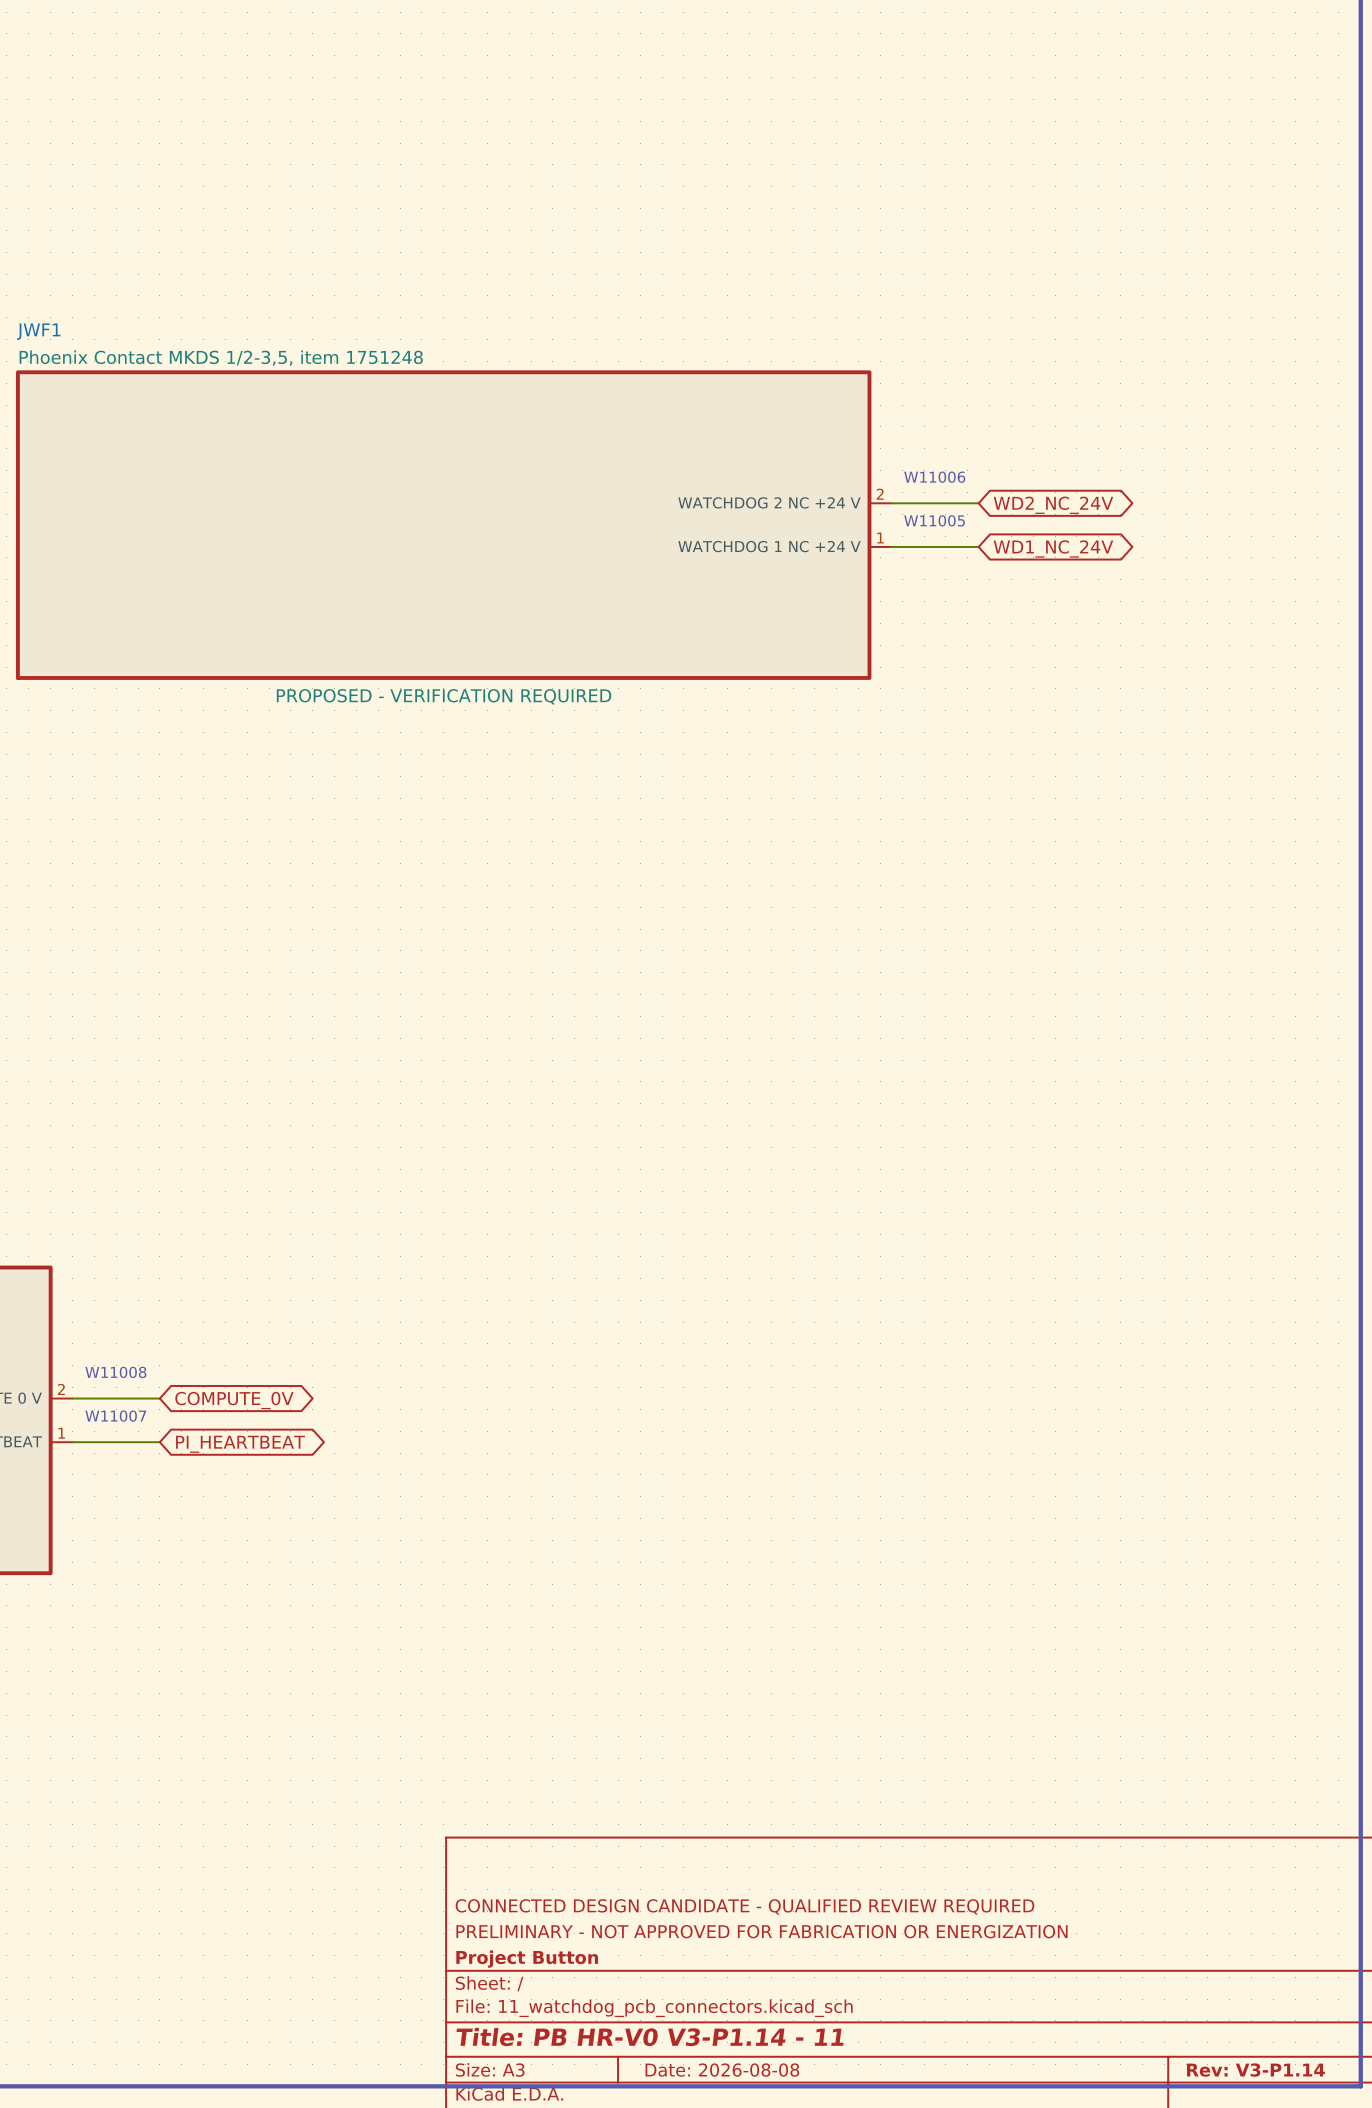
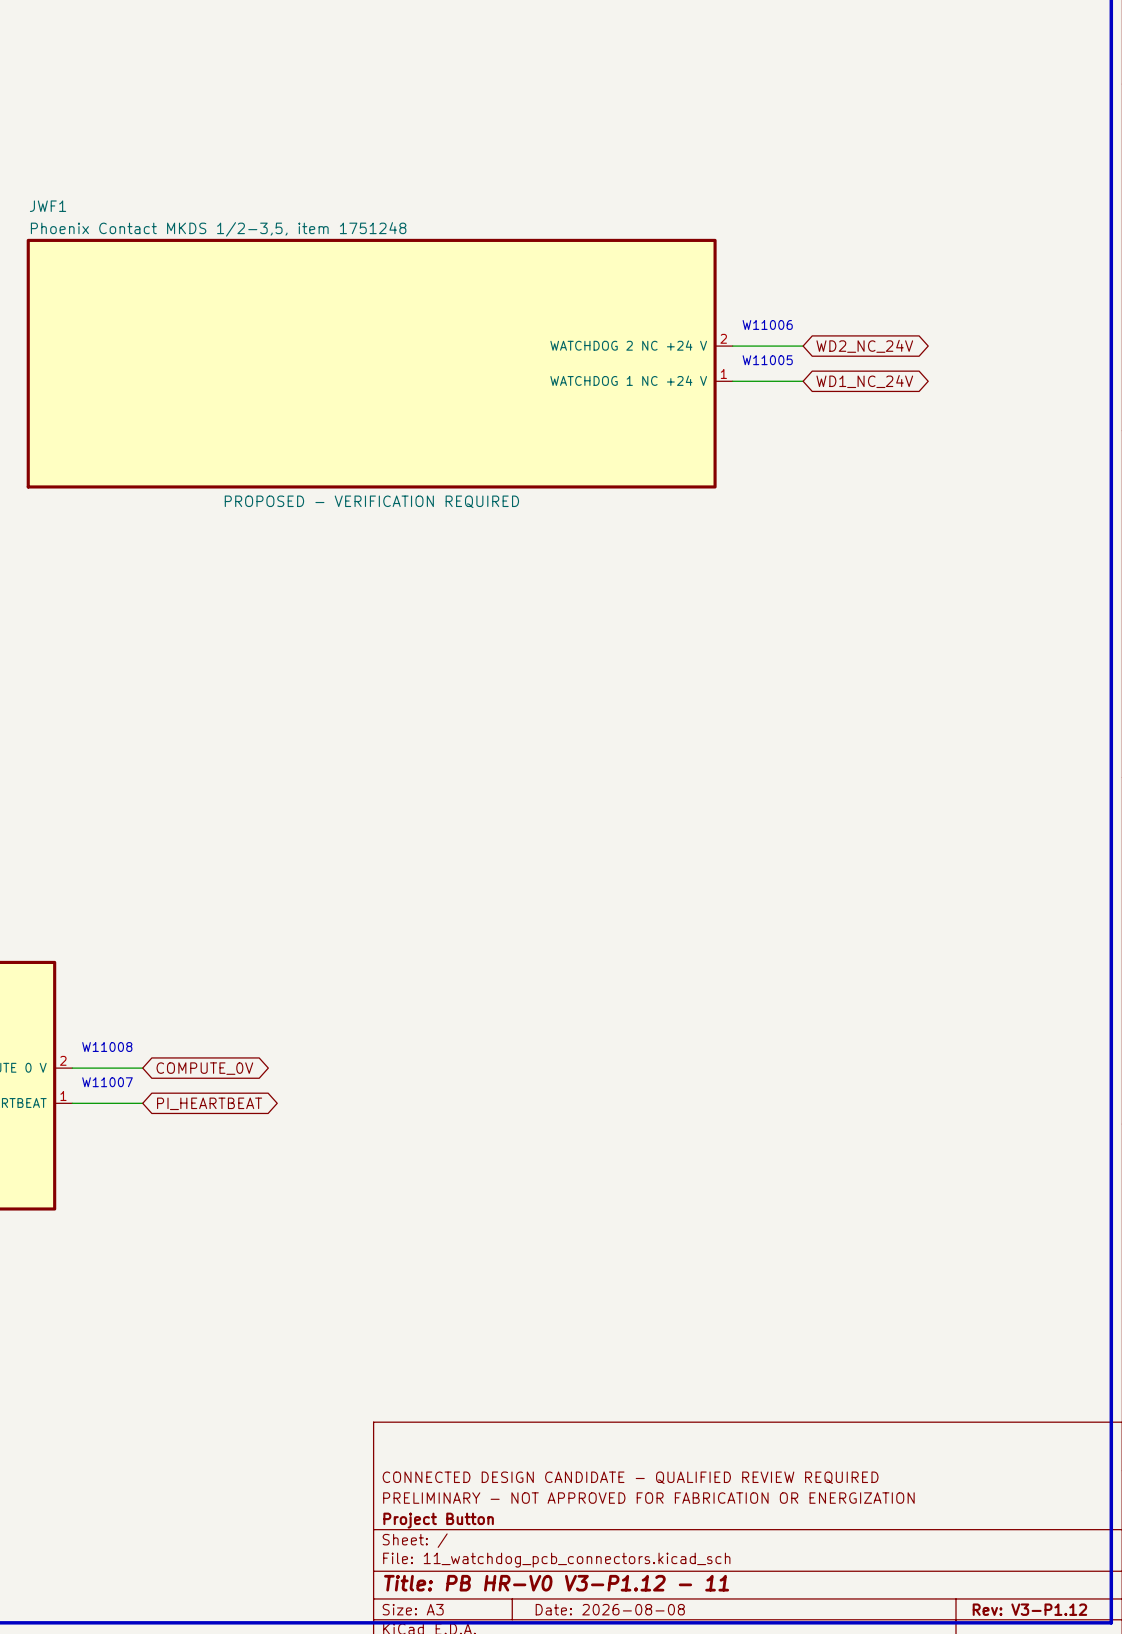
title block: Title: PB HR-V0 V3-P1.14 - 11 (650, 2037) -> Title: PB HR-V0 V3-P1.12 - 11 (556, 1583)
title block: Rev: V3-P1.14 (1255, 2070) -> Rev: V3-P1.12 (1029, 1609)

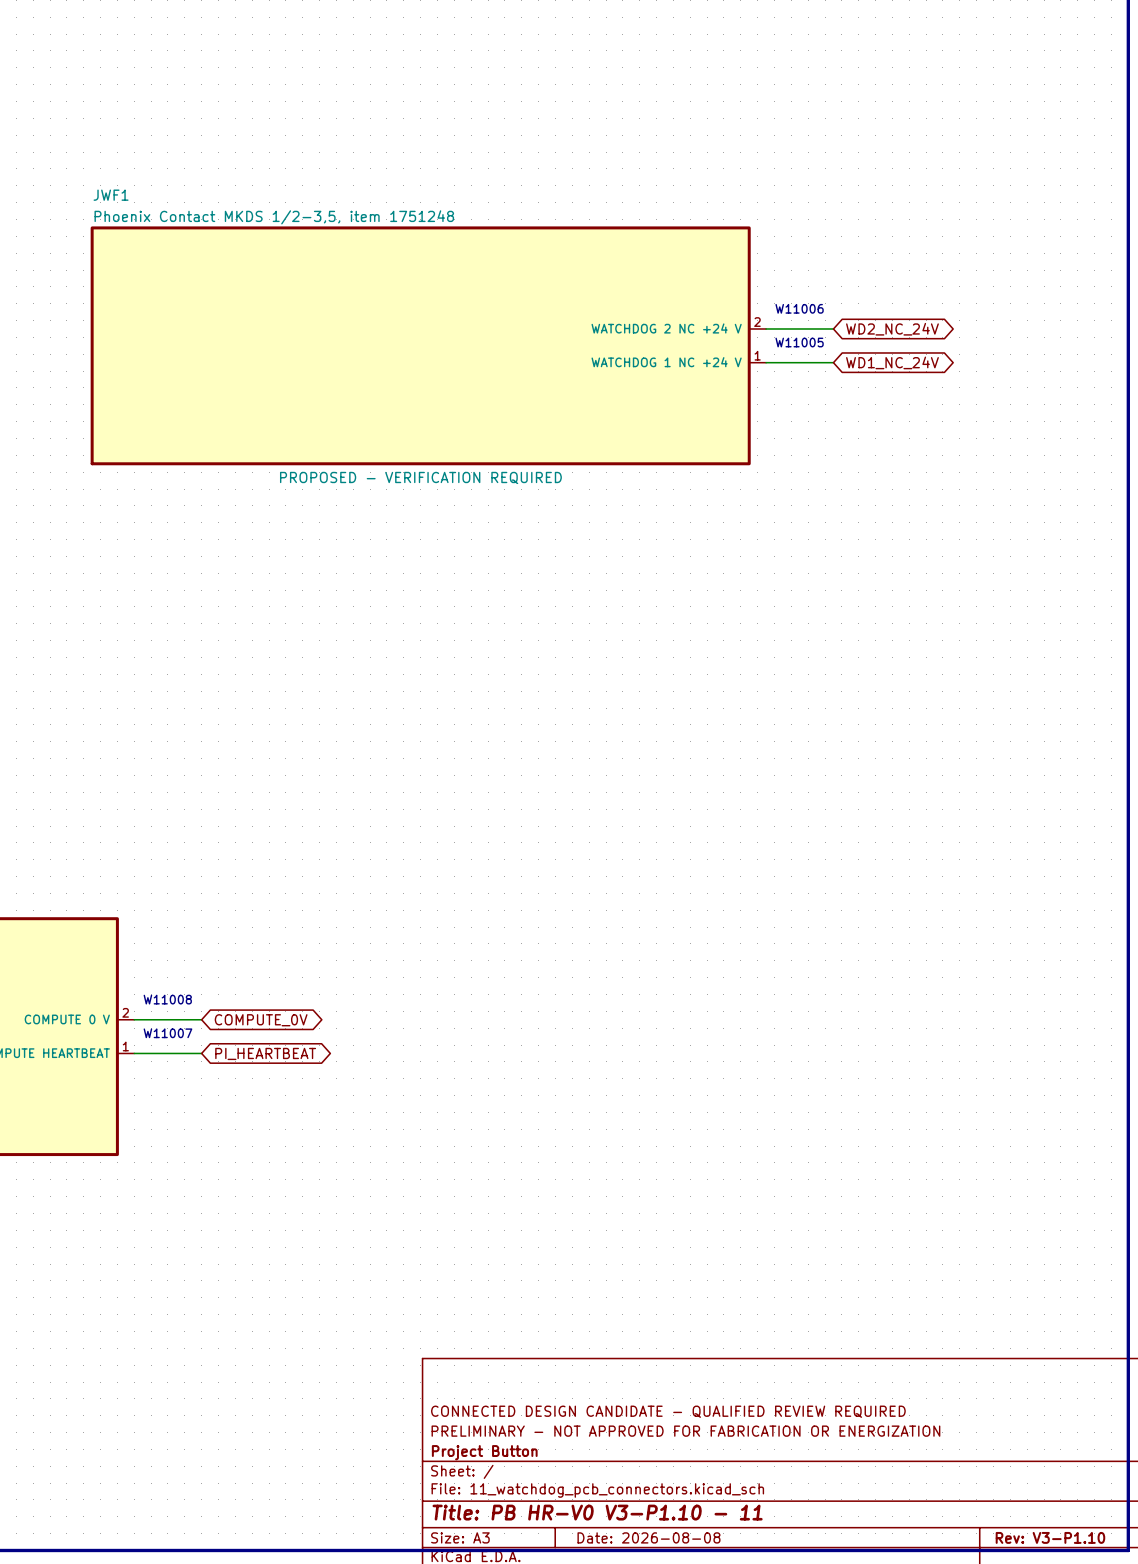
title block: Title: PB HR-V0 V3-P1.12 - 11 (556, 1583) -> Title: PB HR-V0 V3-P1.10 - 11 (597, 1512)
title block: Rev: V3-P1.12 (1029, 1609) -> Rev: V3-P1.10 (1050, 1537)

